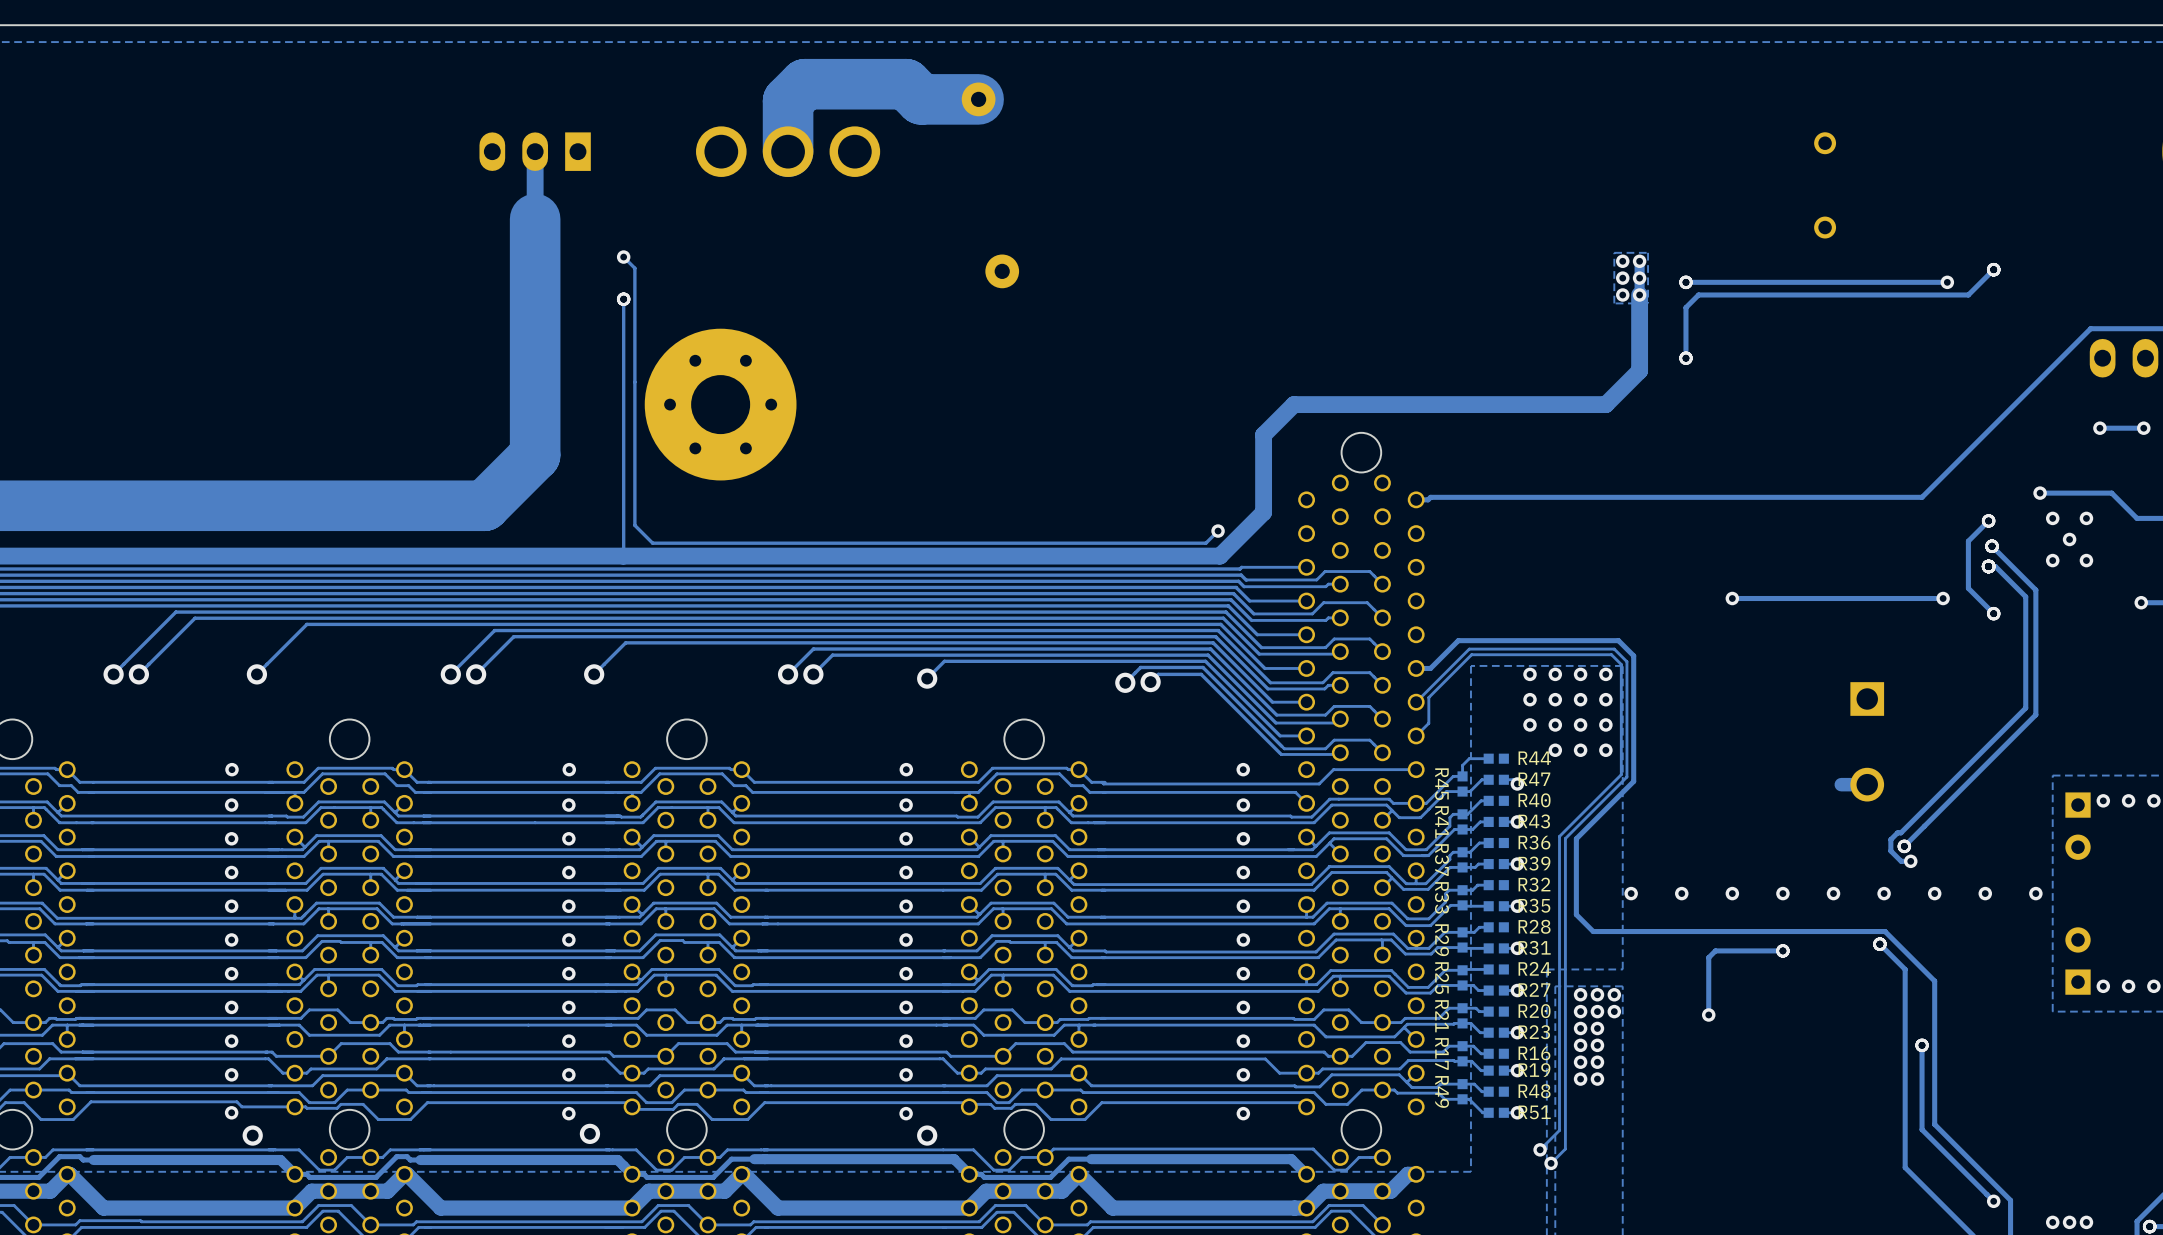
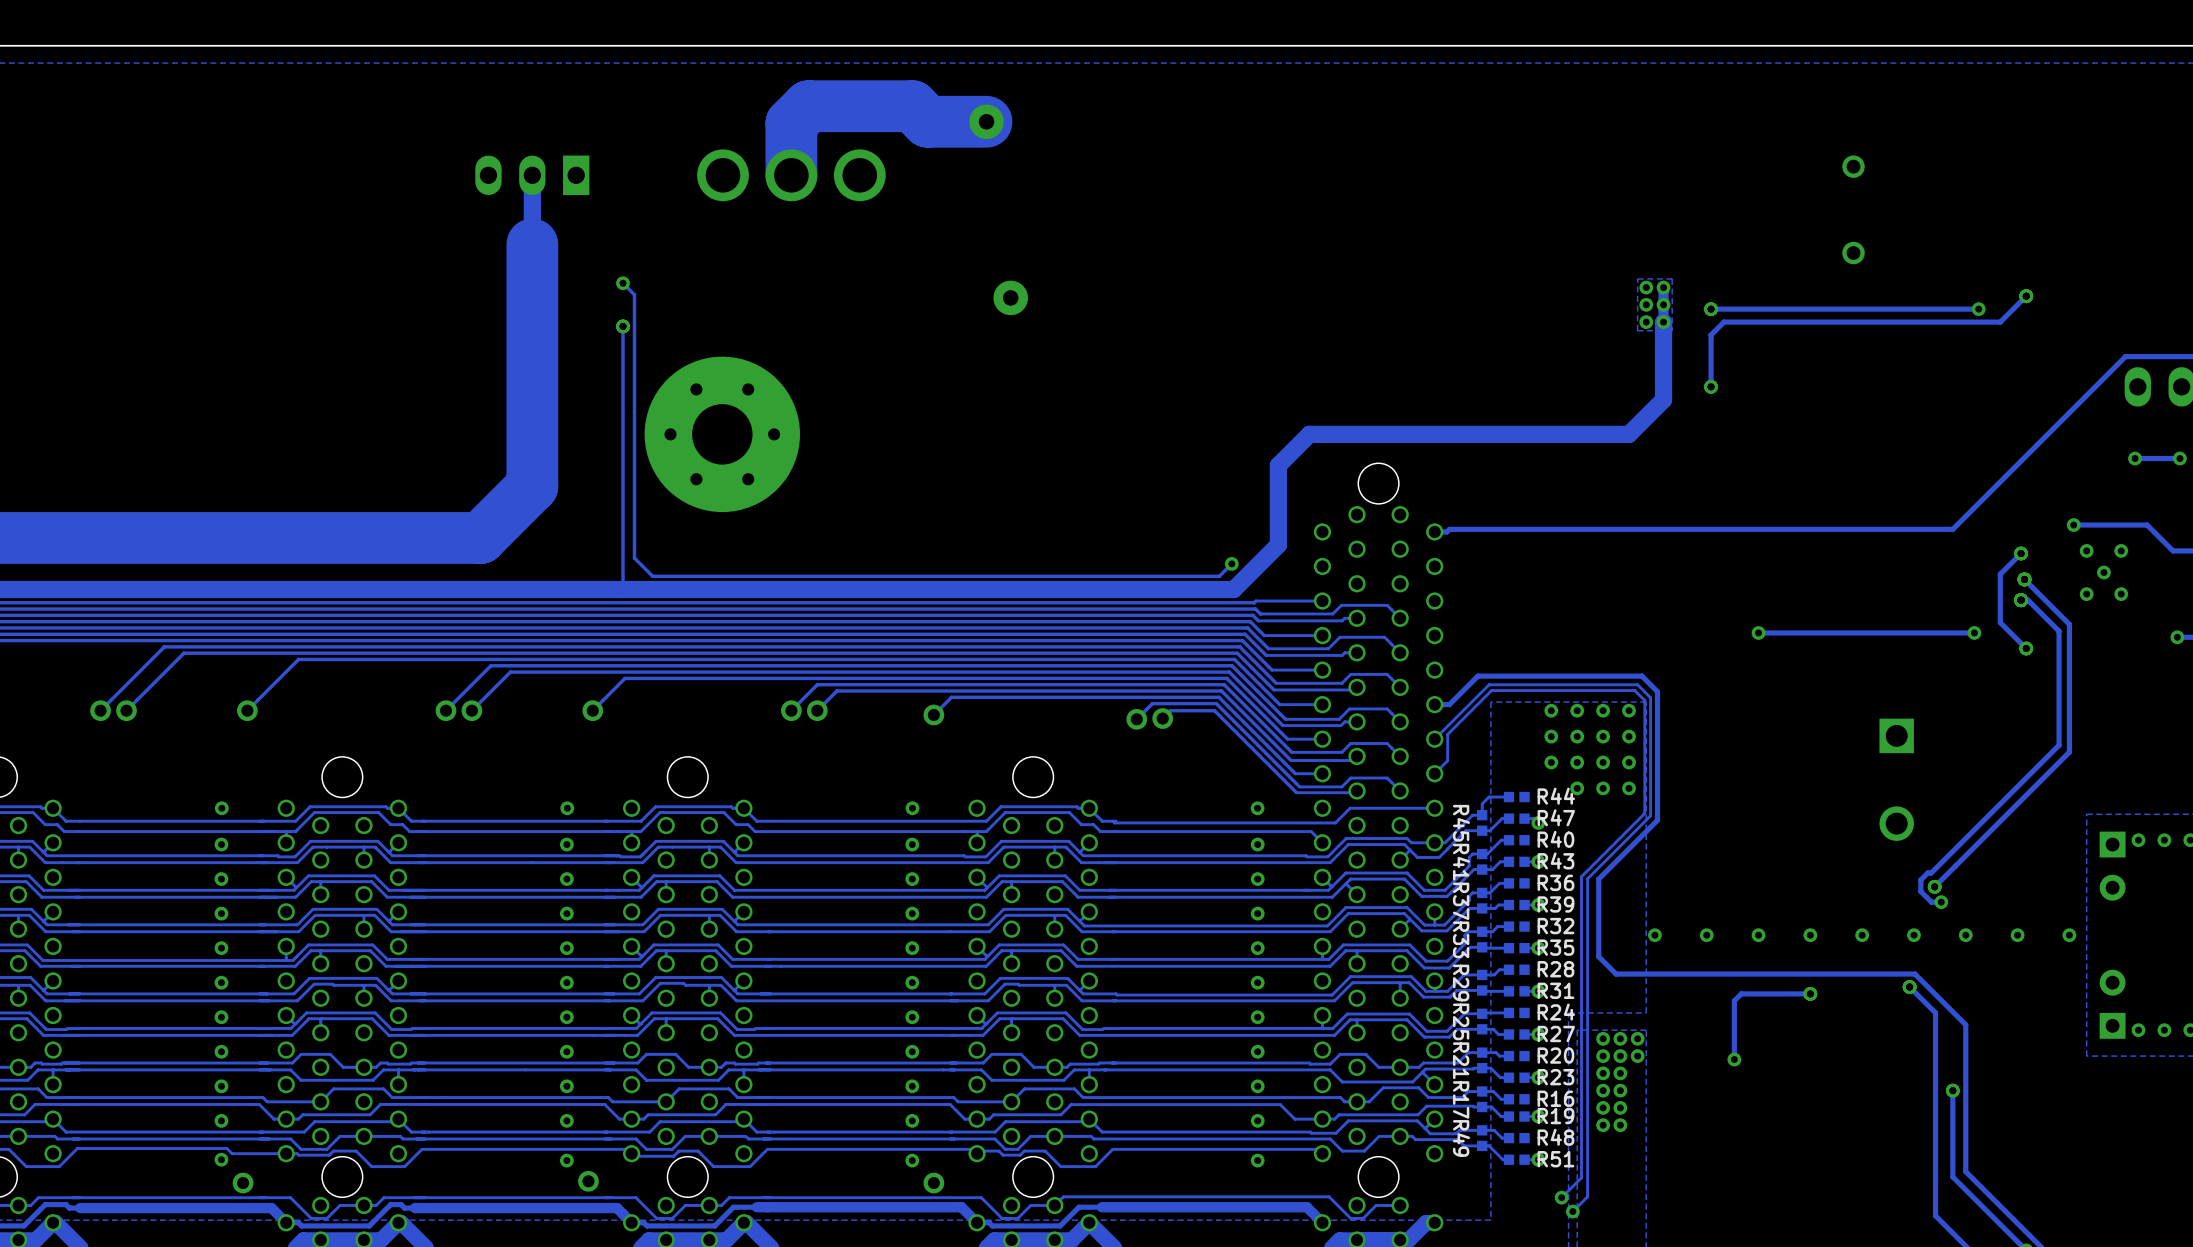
track: (1867, 784) (1841, 784) -> none

